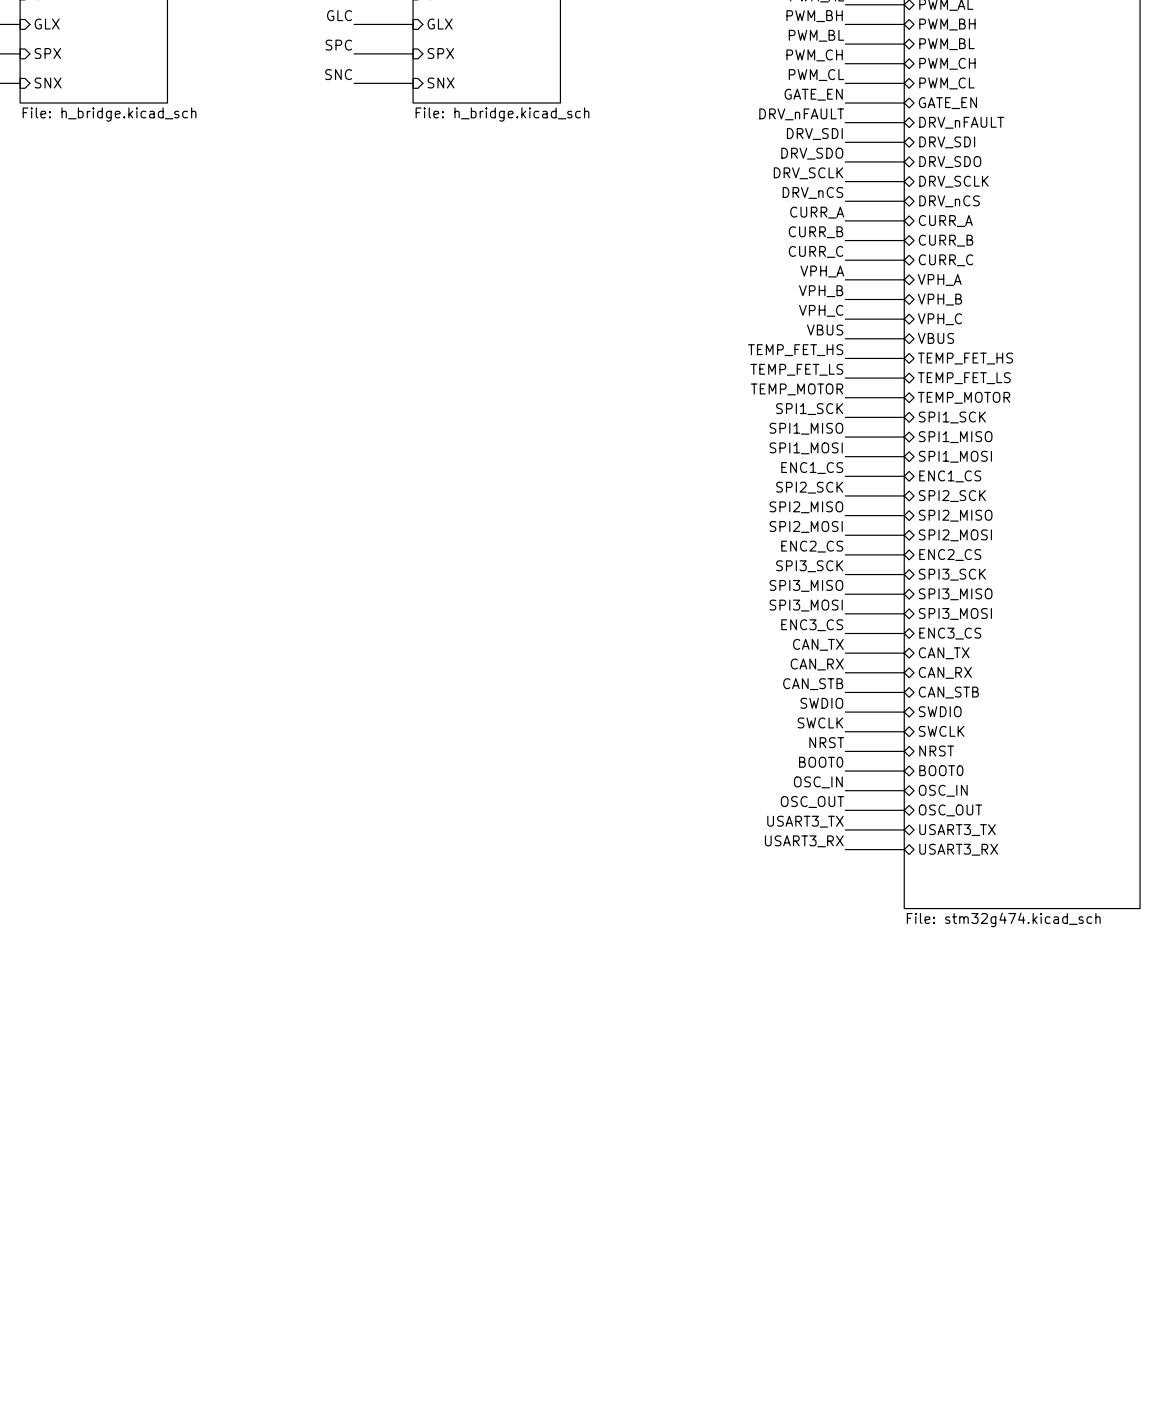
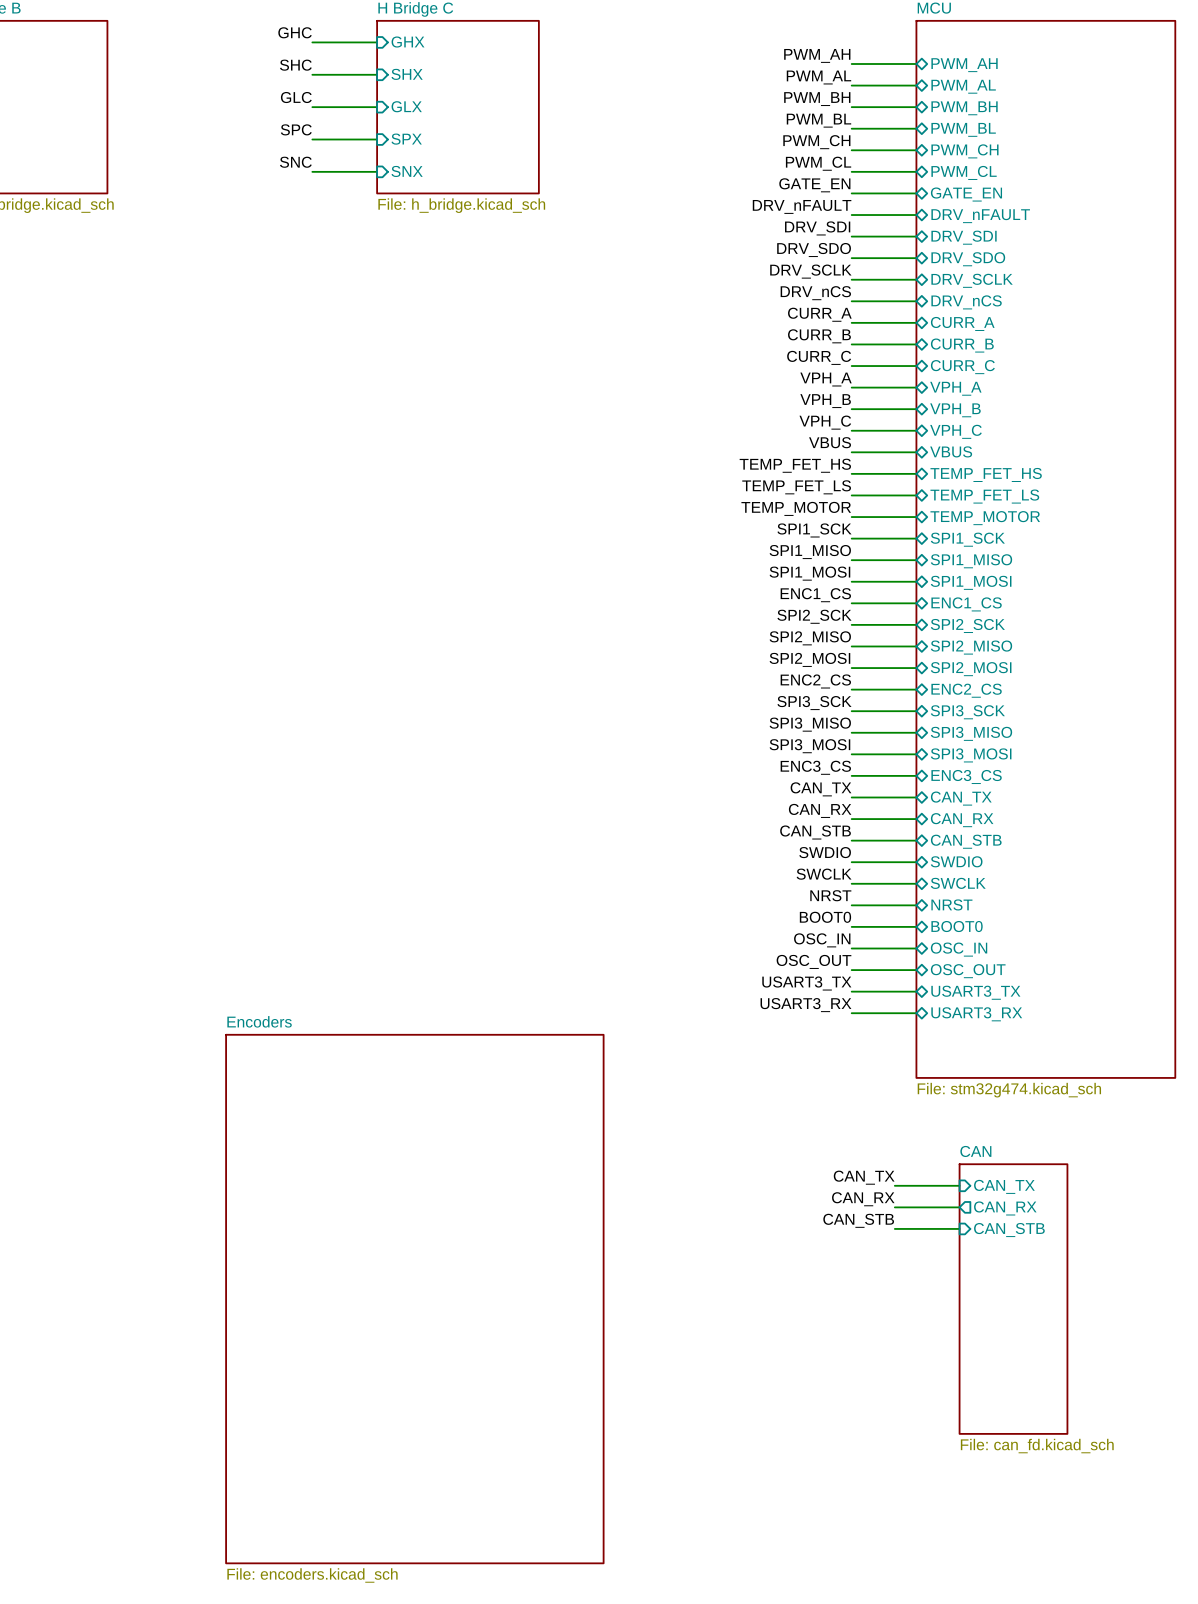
label: none -> CAN_TX (864, 1177)
wire: none -> (894, 1185) (959, 1185)
sheet pin: none -> CAN_TX (1004, 1186)
label: none -> CAN_RX (863, 1199)
wire: none -> (894, 1207) (959, 1207)
sheet pin: none -> CAN_RX (1005, 1208)
label: none -> CAN_STB (858, 1220)
wire: none -> (894, 1228) (959, 1228)
sheet pin: none -> CAN_STB (1009, 1230)
sheet Encoders: none -> File: encoders.kicad_sch (414, 1299)
sheet CAN: none -> File: can_fd.kicad_sch (1013, 1299)

